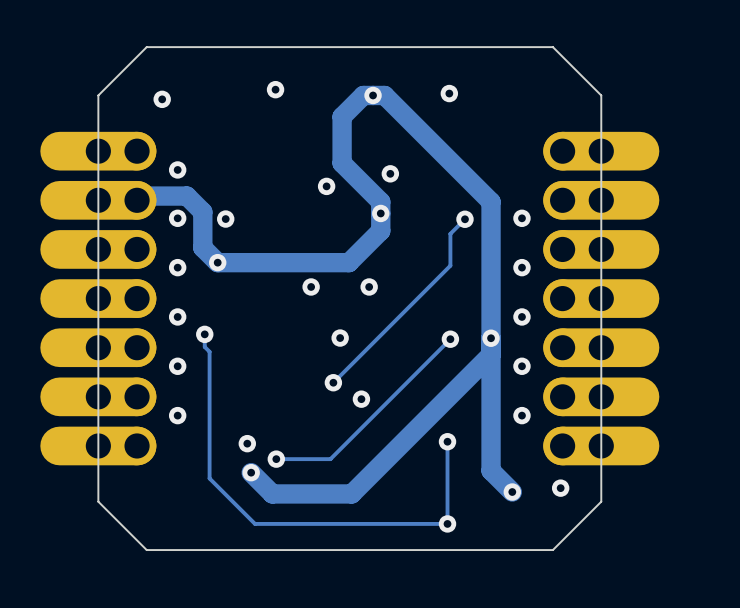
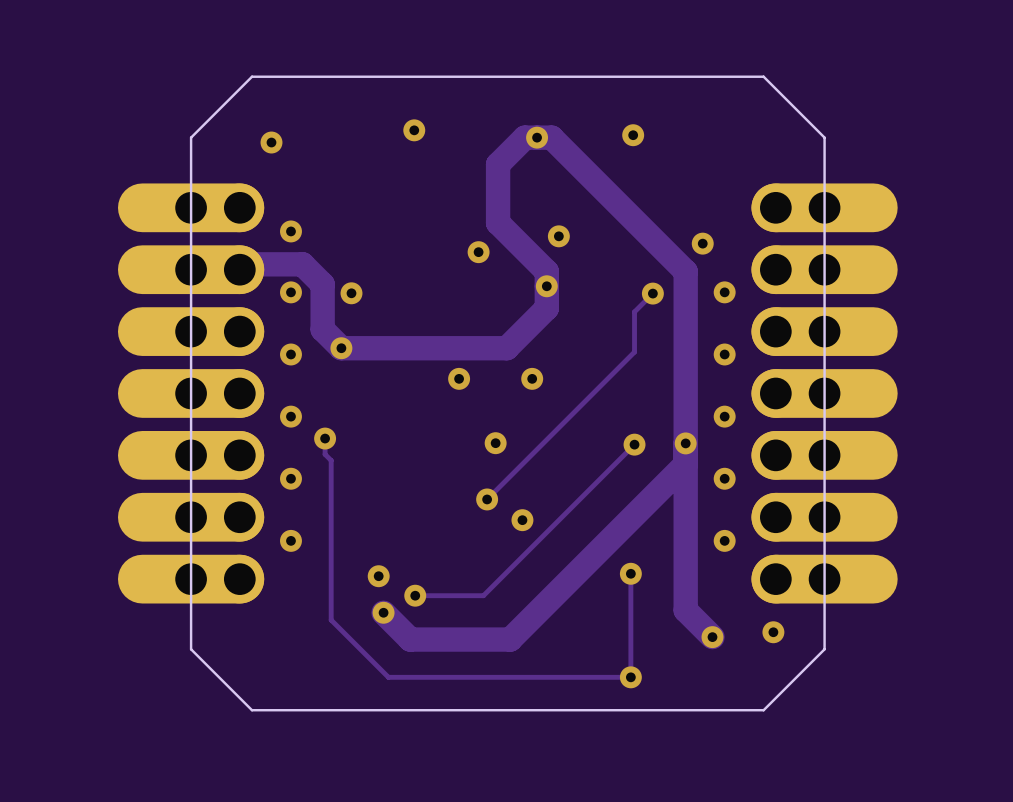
via: none -> (702, 243)

